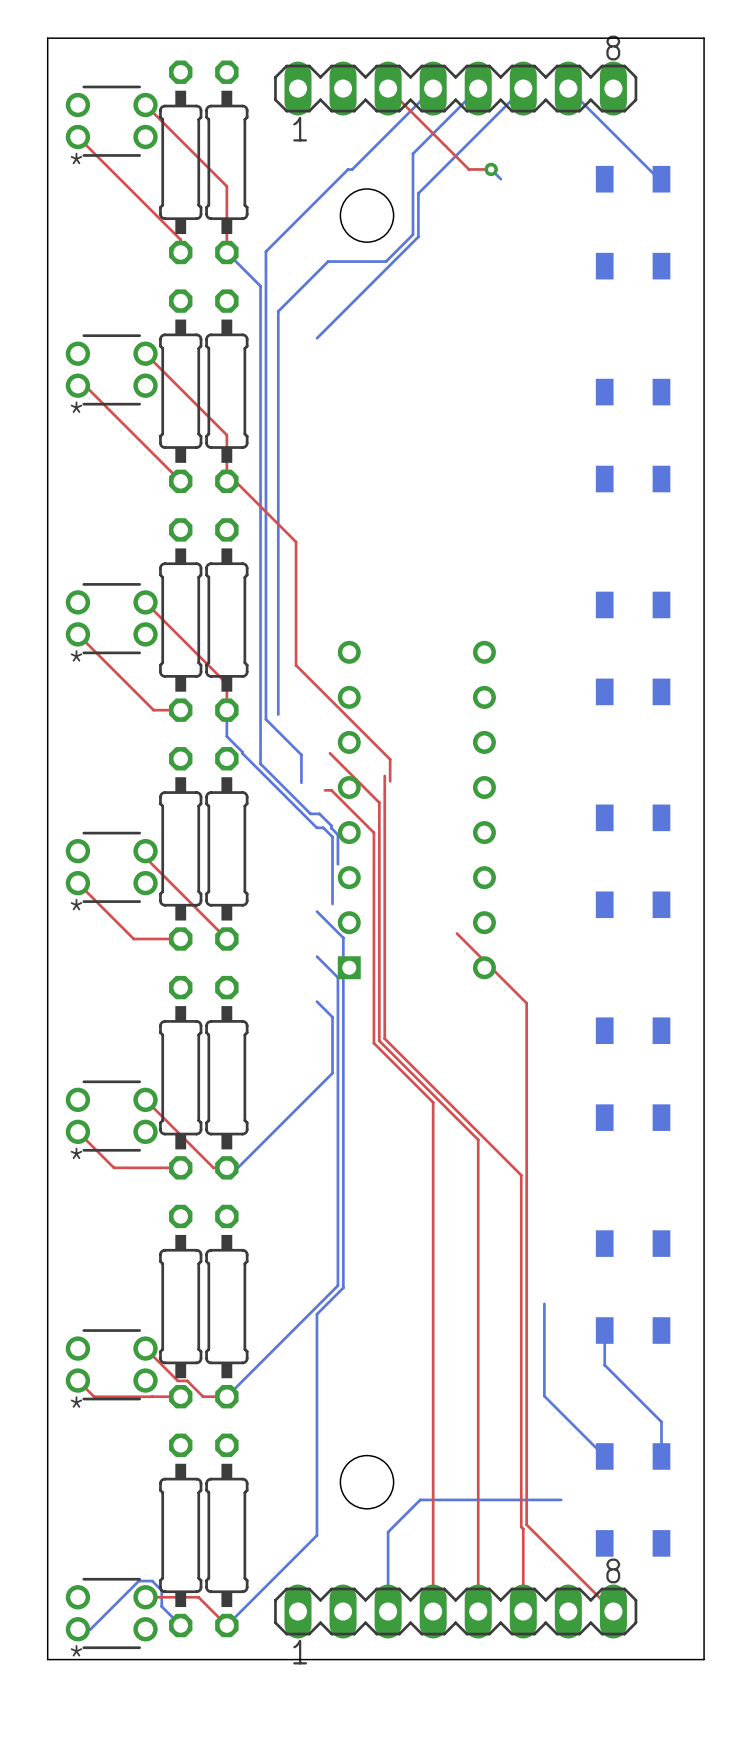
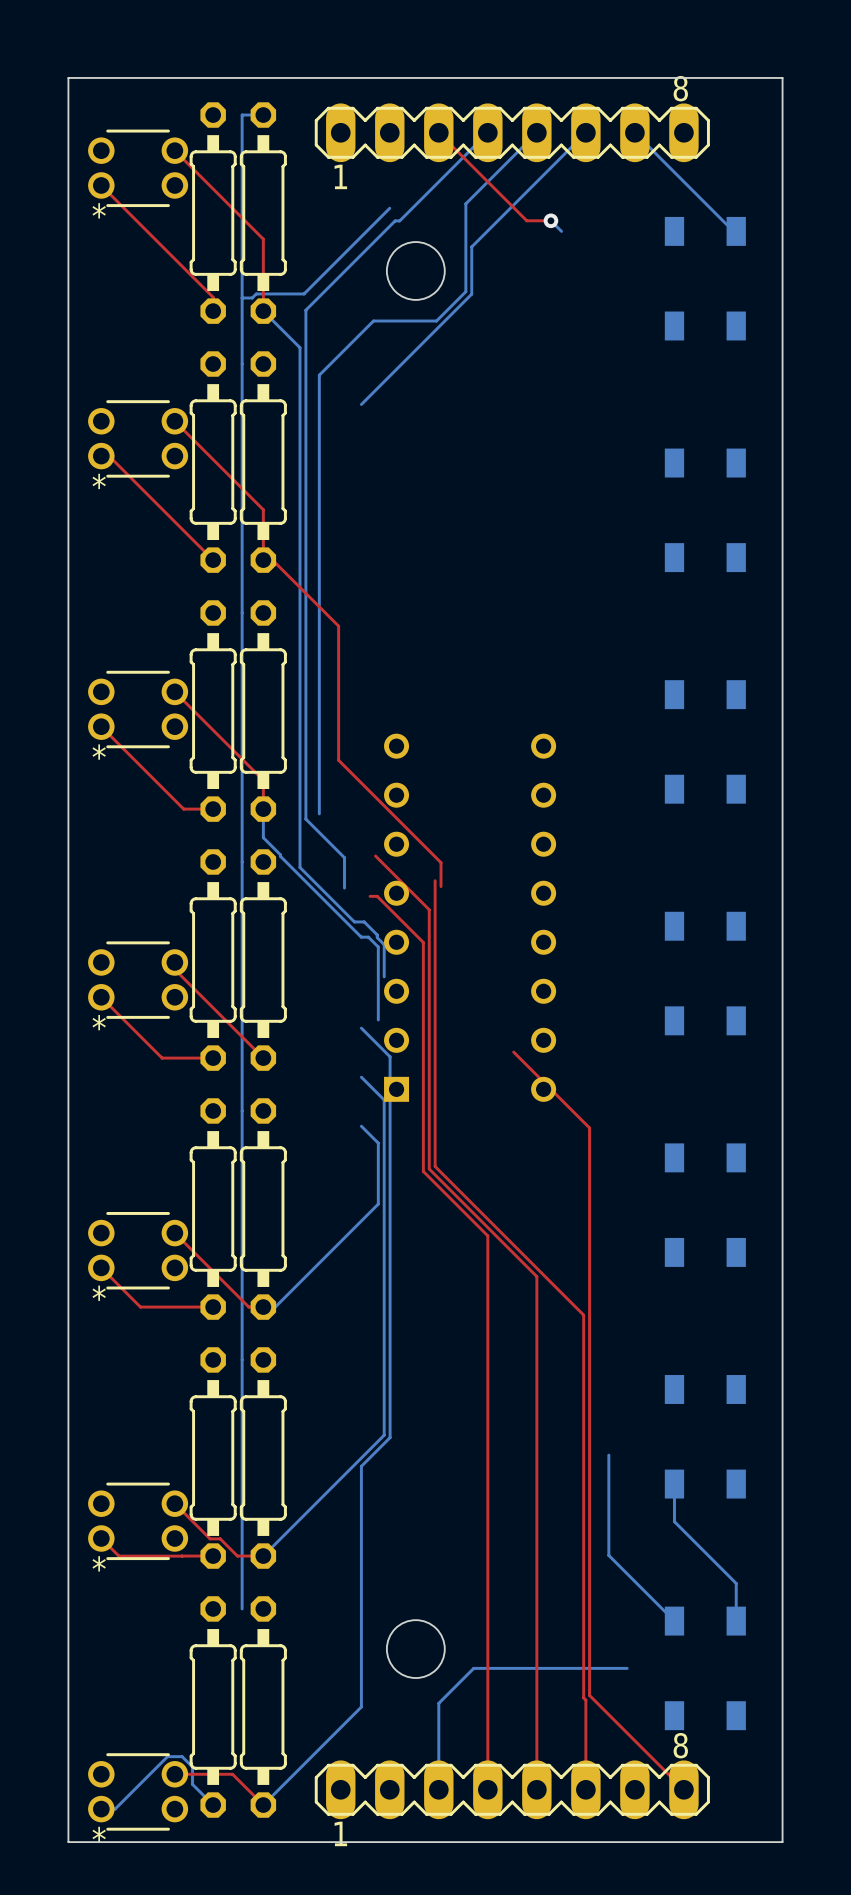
bottom track: none -> (263, 115) (242, 115) (242, 1608)
bottom track: none -> (389, 208) (304, 293) (256, 293) (252, 298) (242, 298)

